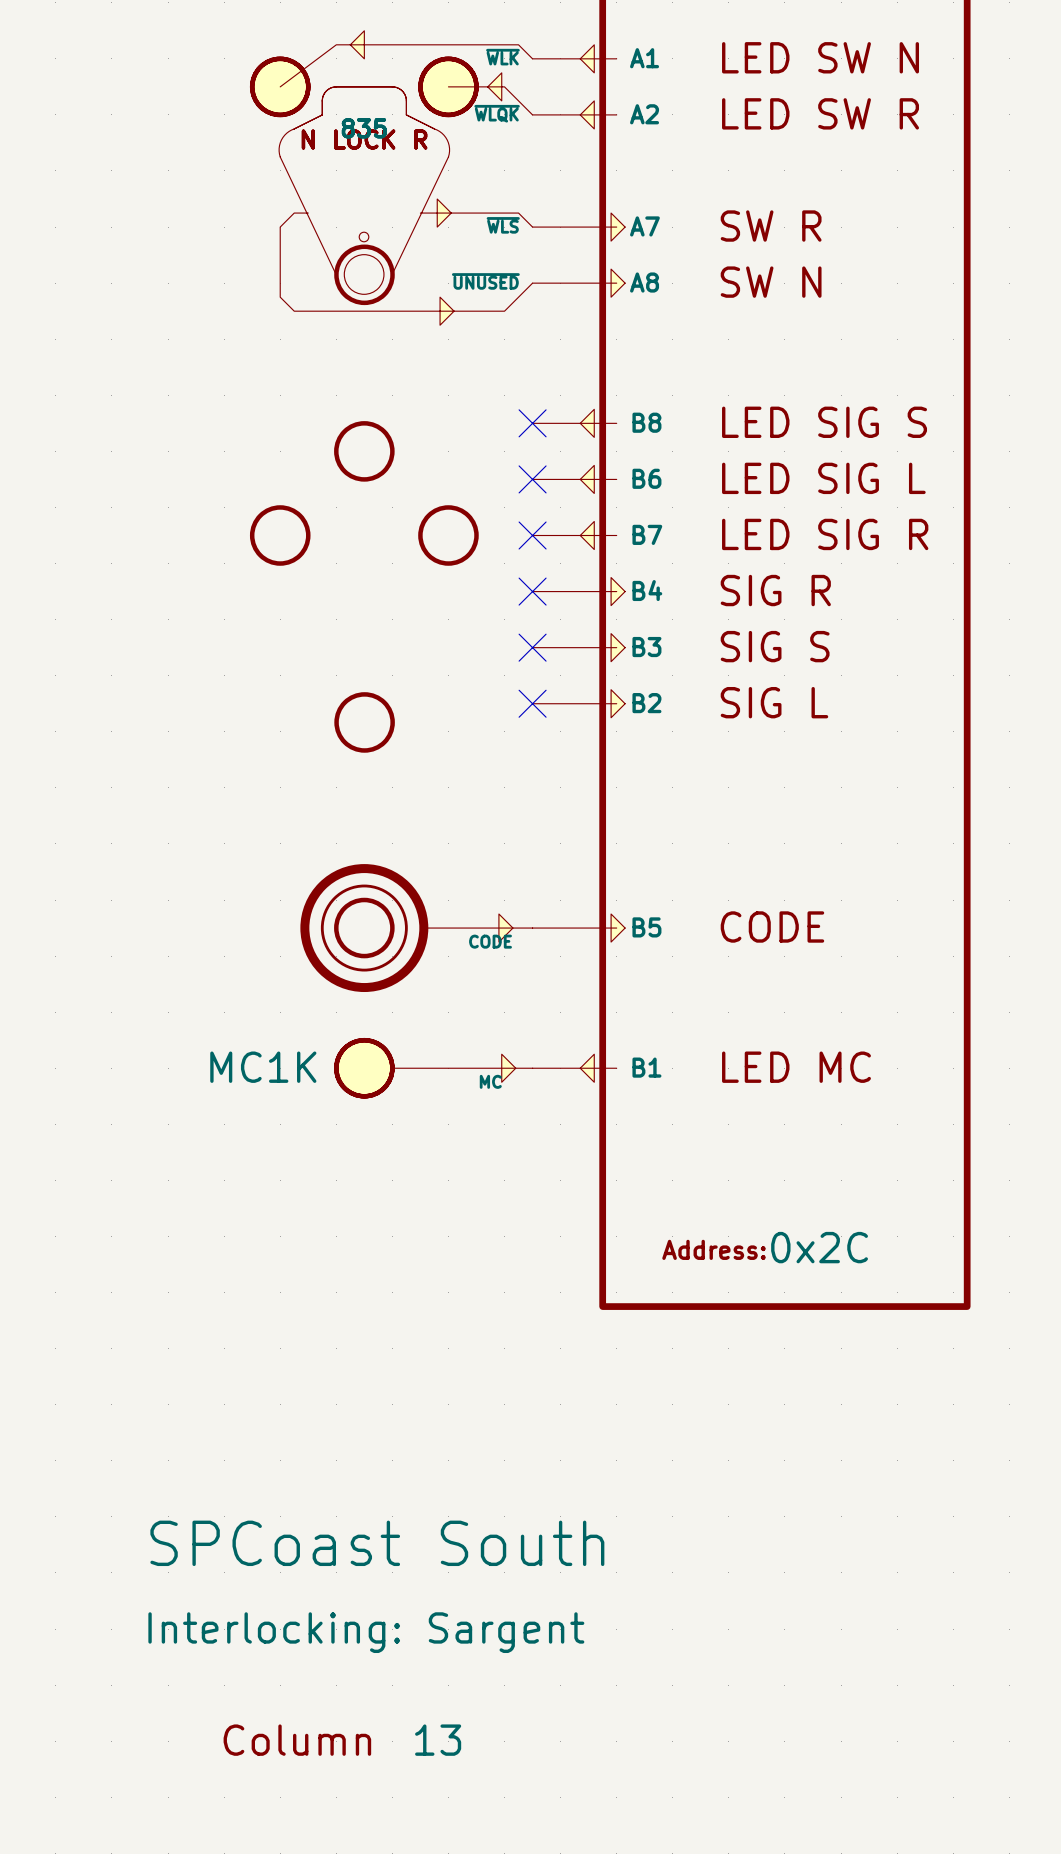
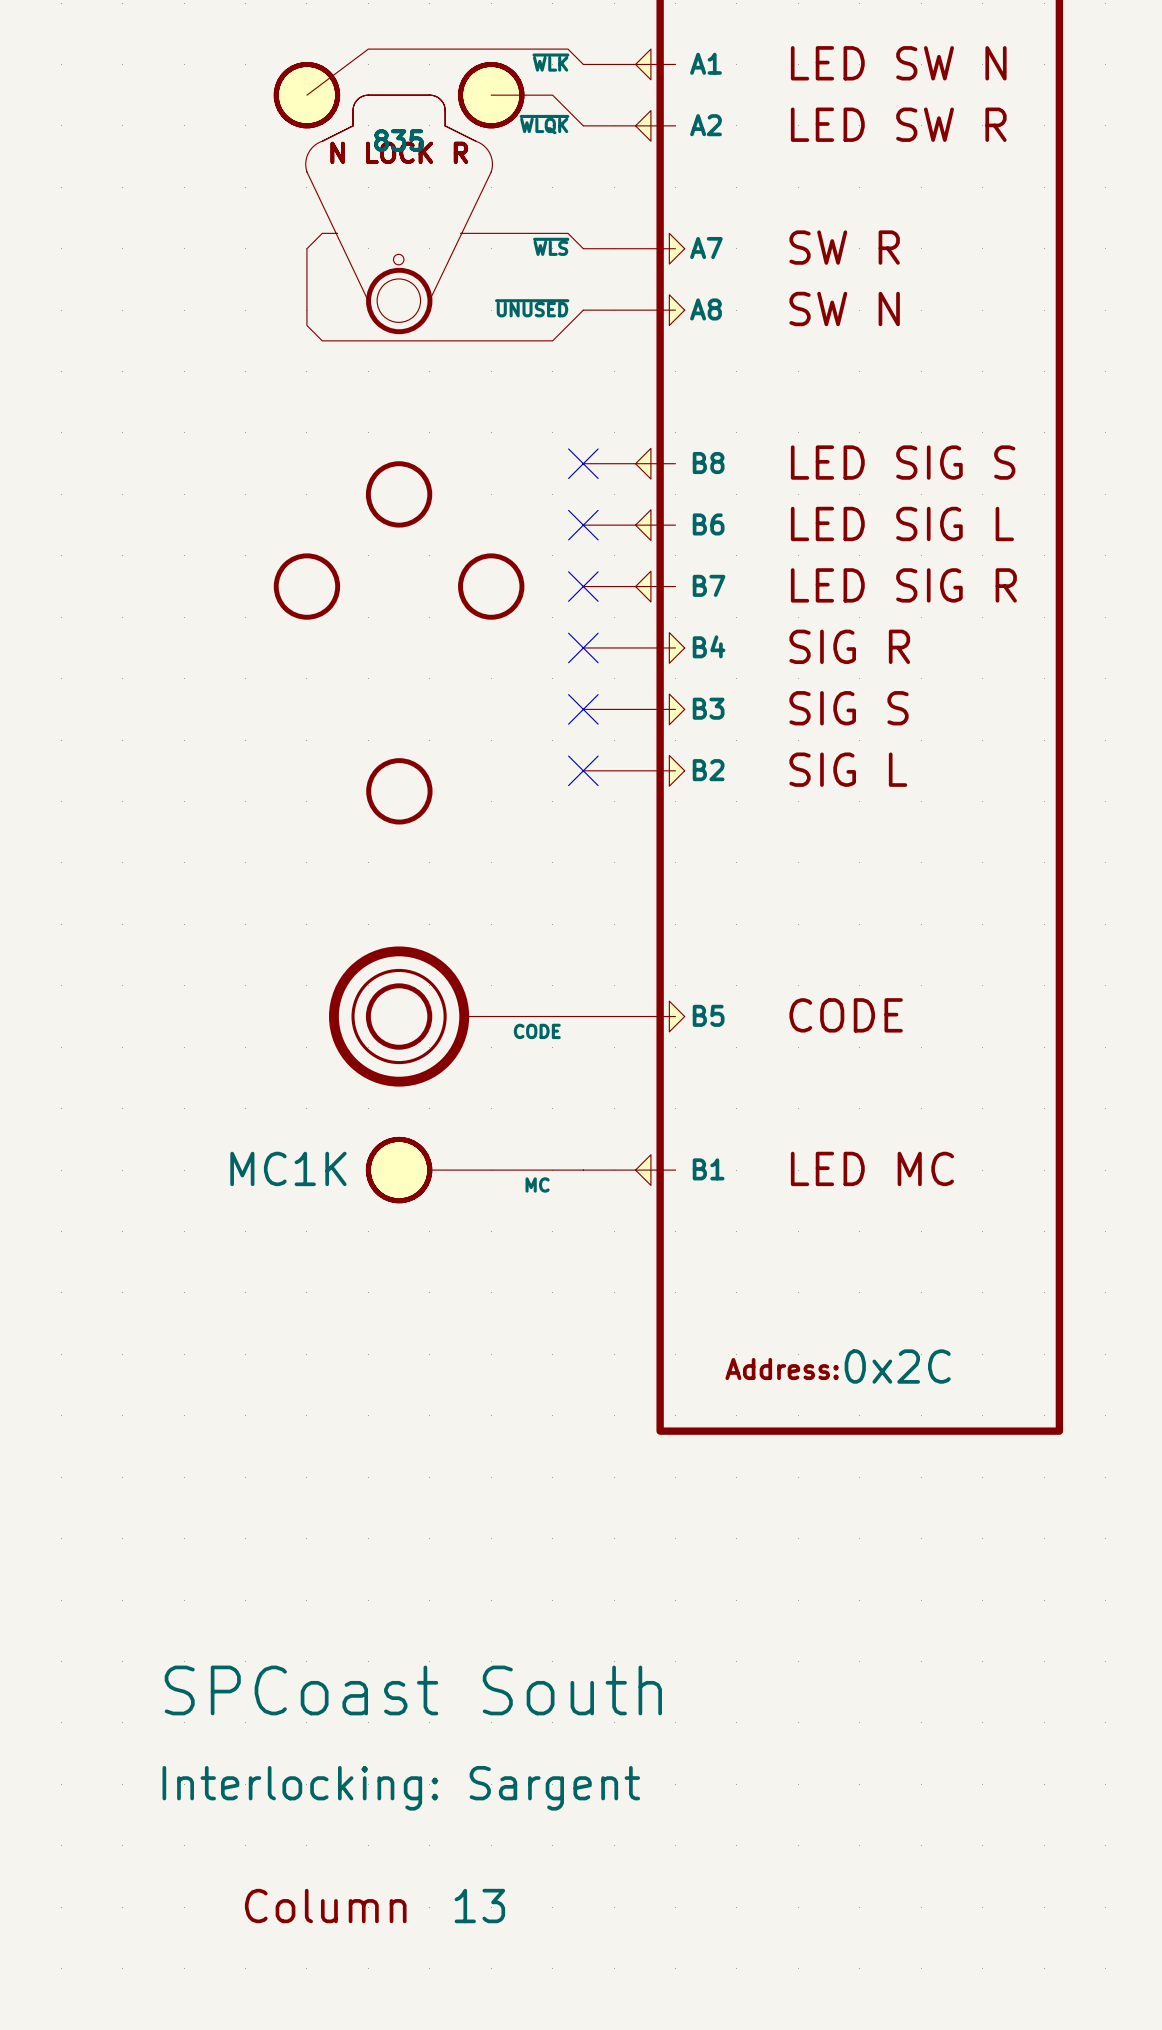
part symbol: [249, 30, 533, 129] -> [273, 49, 584, 142]
part symbol: [279, 86, 533, 326] -> [305, 95, 584, 341]
part symbol: [300, 864, 533, 993] -> [329, 946, 584, 1087]
part symbol: [334, 1037, 533, 1099] -> [365, 1136, 584, 1204]

